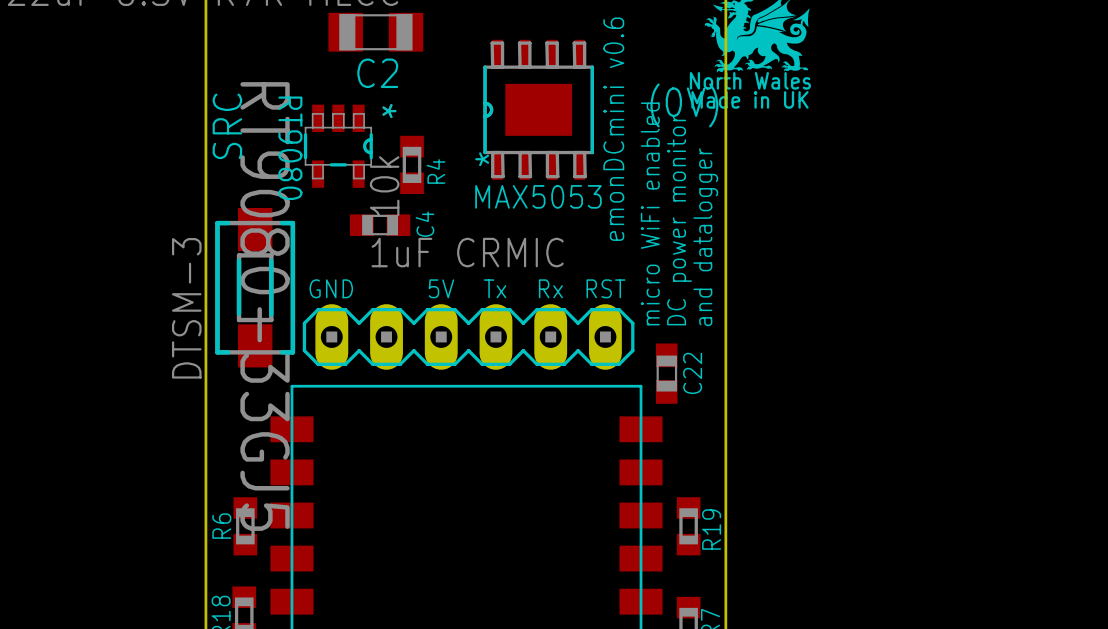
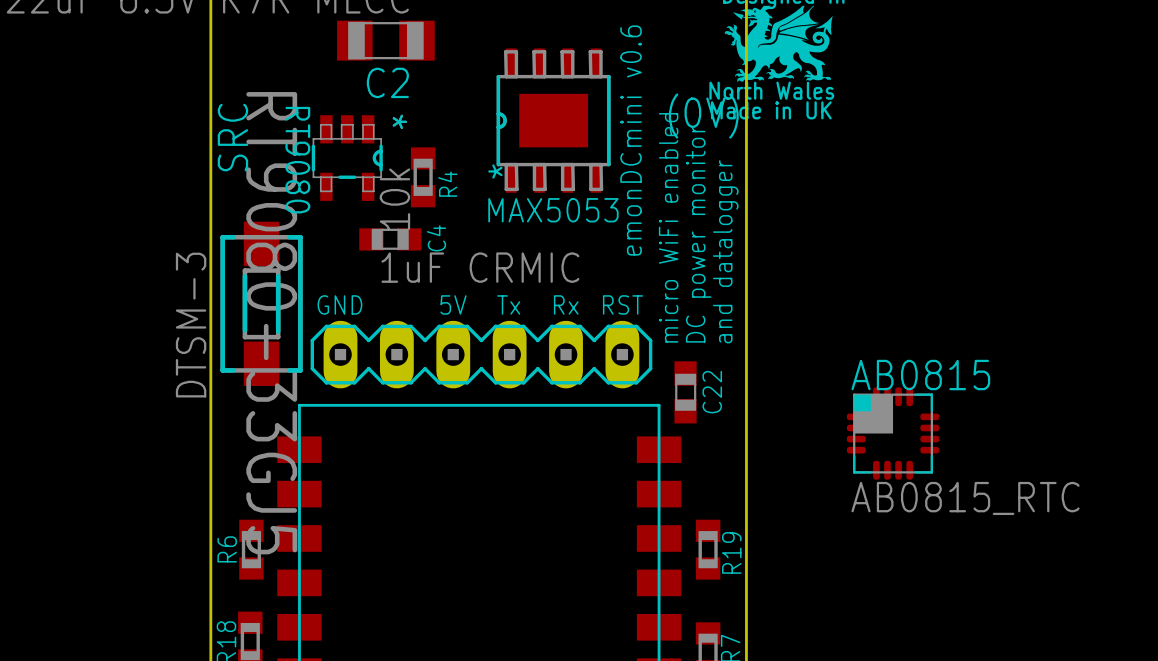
AB0815: none -> AB0815_RTC (893, 433)

